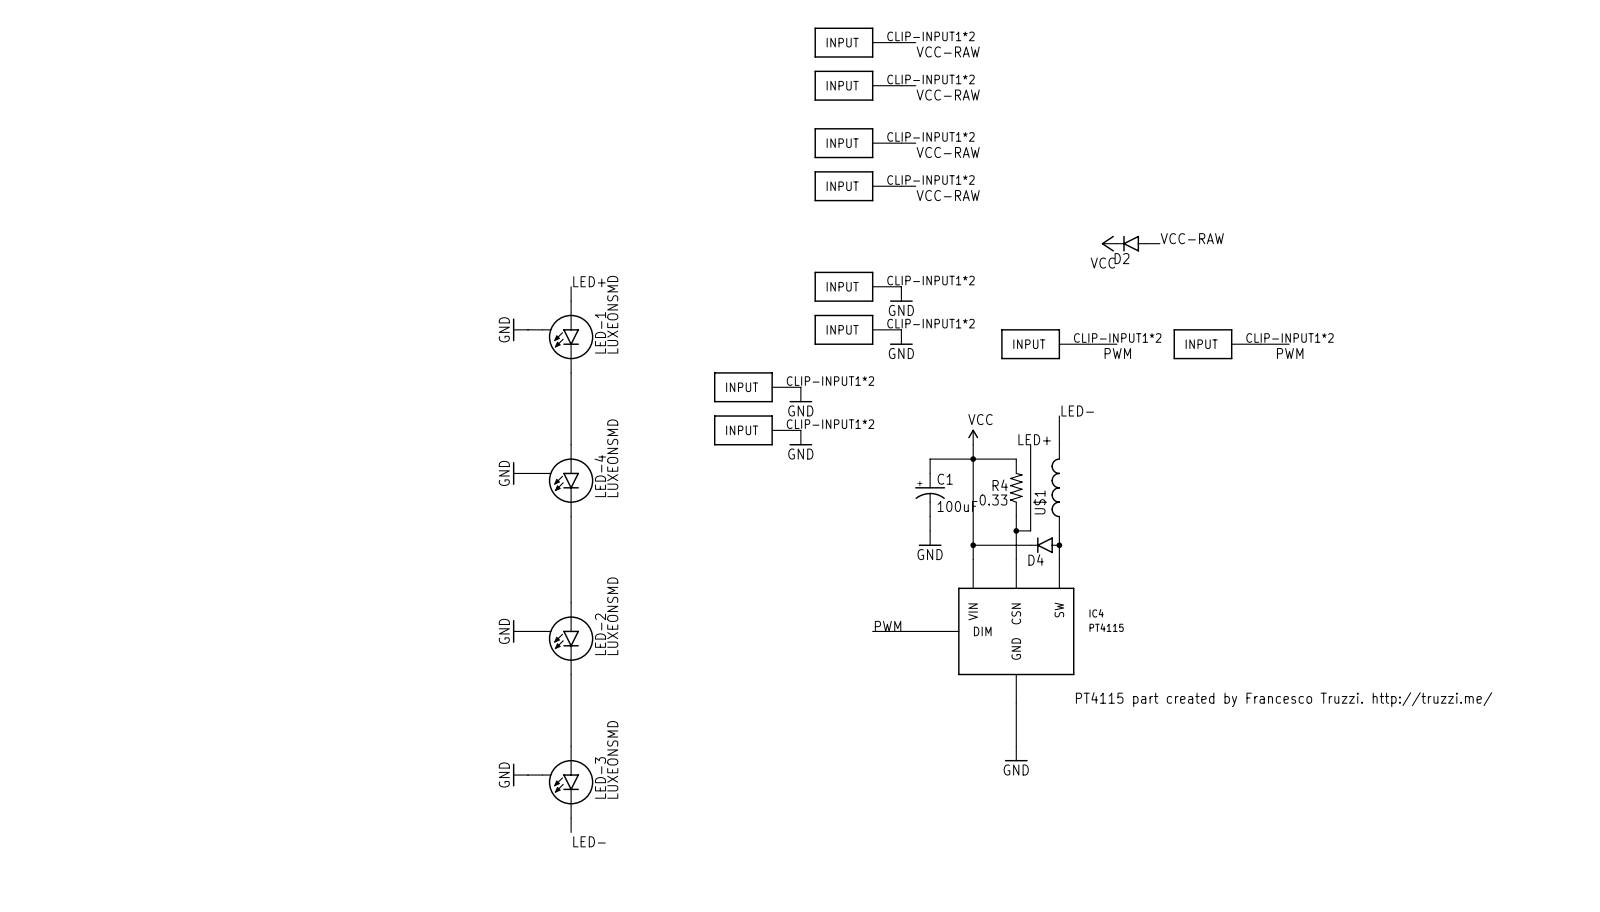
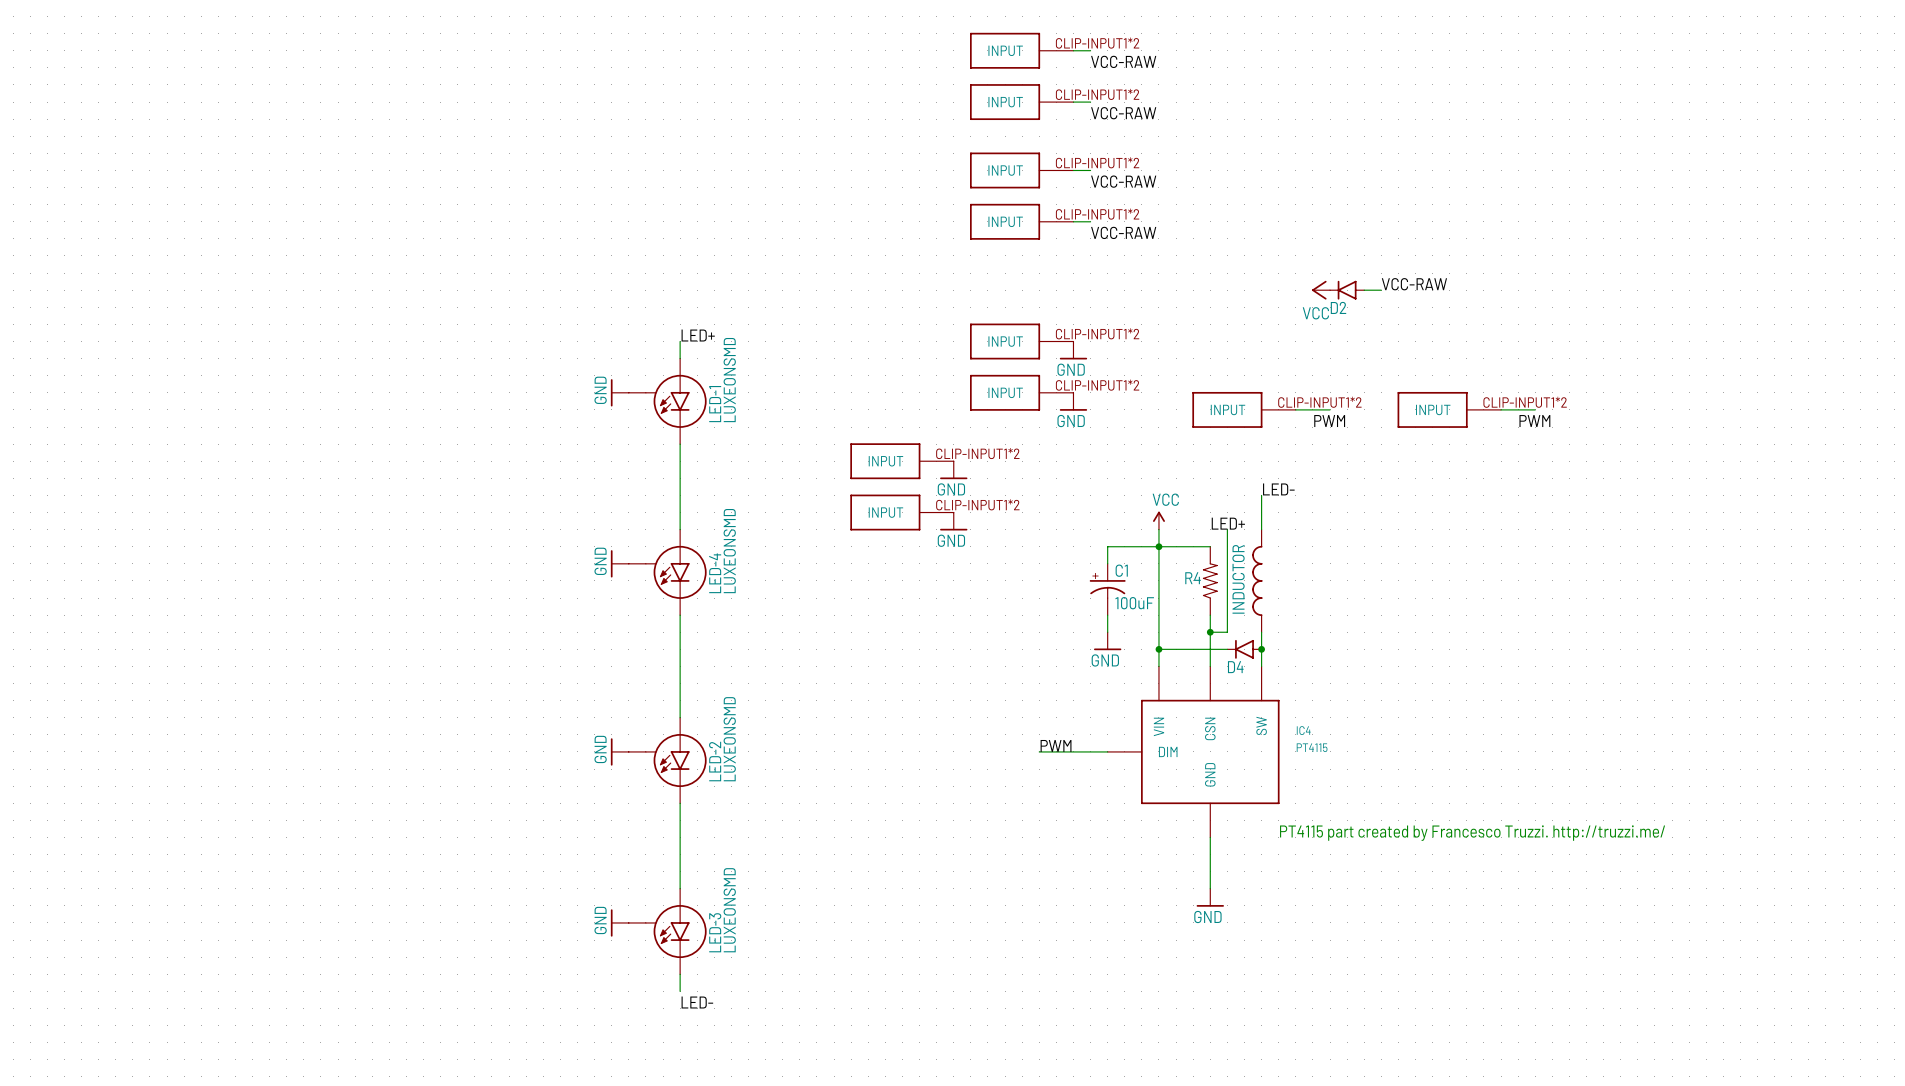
R4 value: 0.33 (993, 500) -> none
U$1 name: U$1 (1039, 502) -> INDUCTOR (1238, 579)

